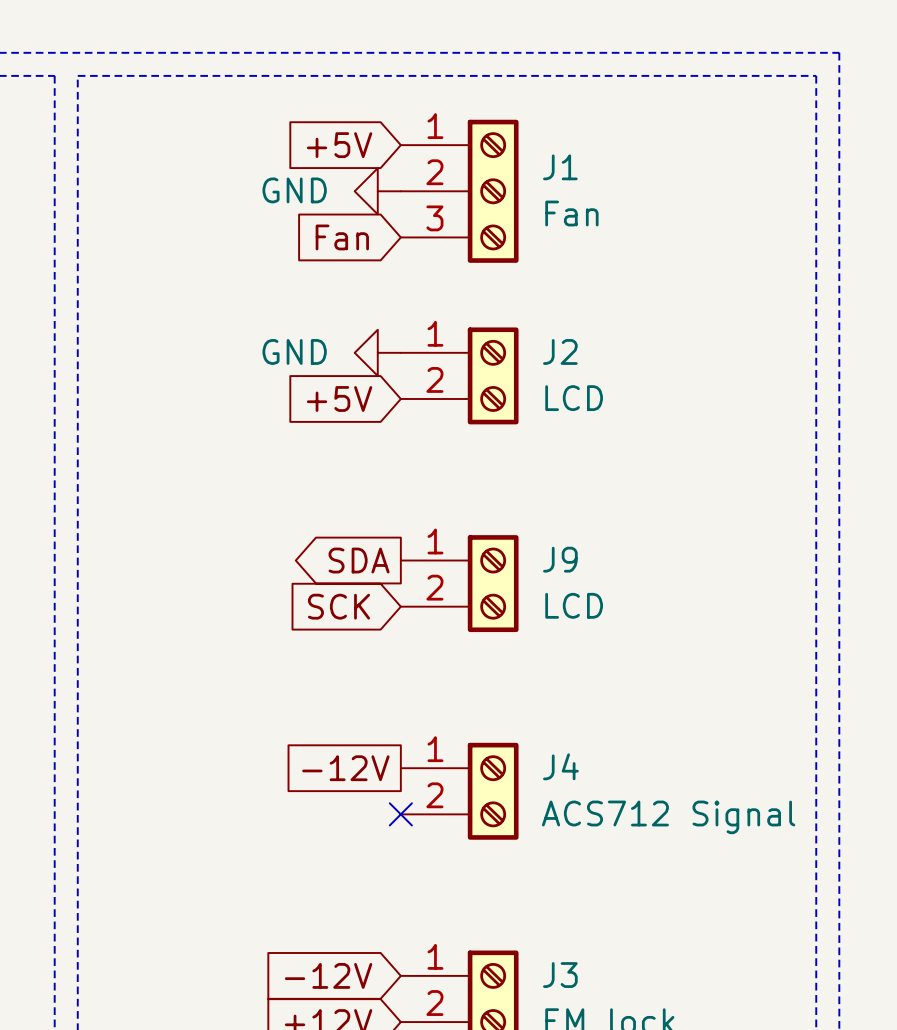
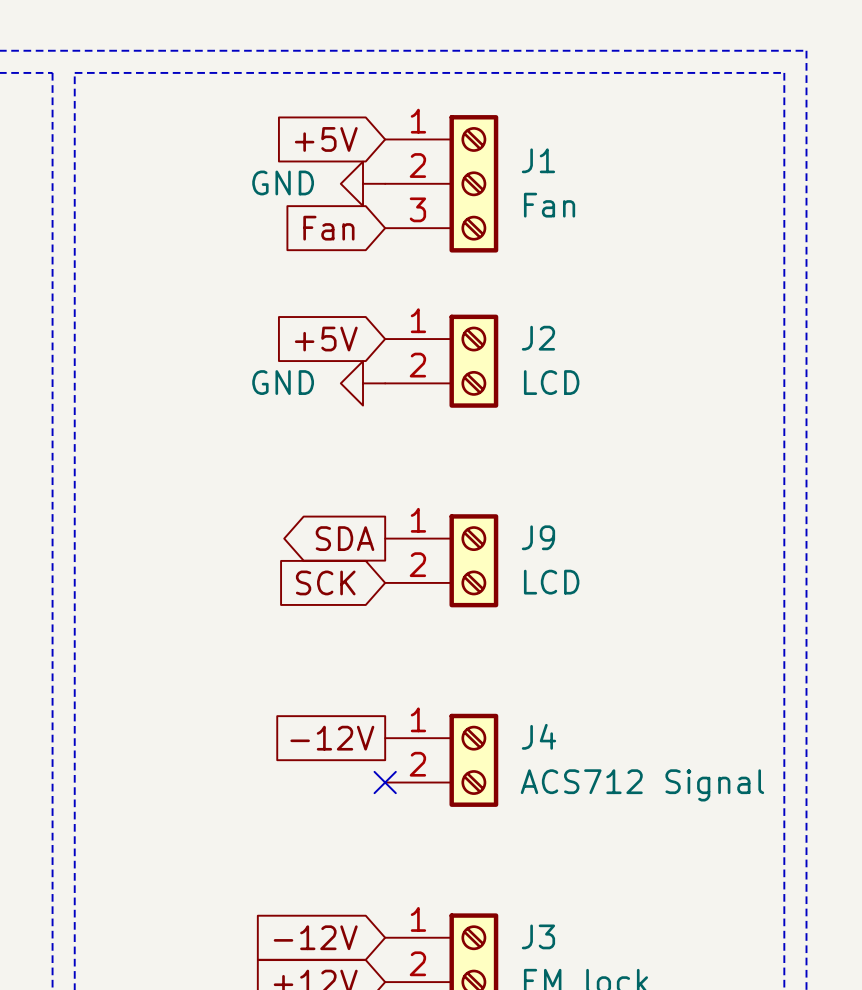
power symbol position: GND (377, 352) -> GND (363, 383)
global label position: +5V (339, 398) -> +5V (326, 339)

